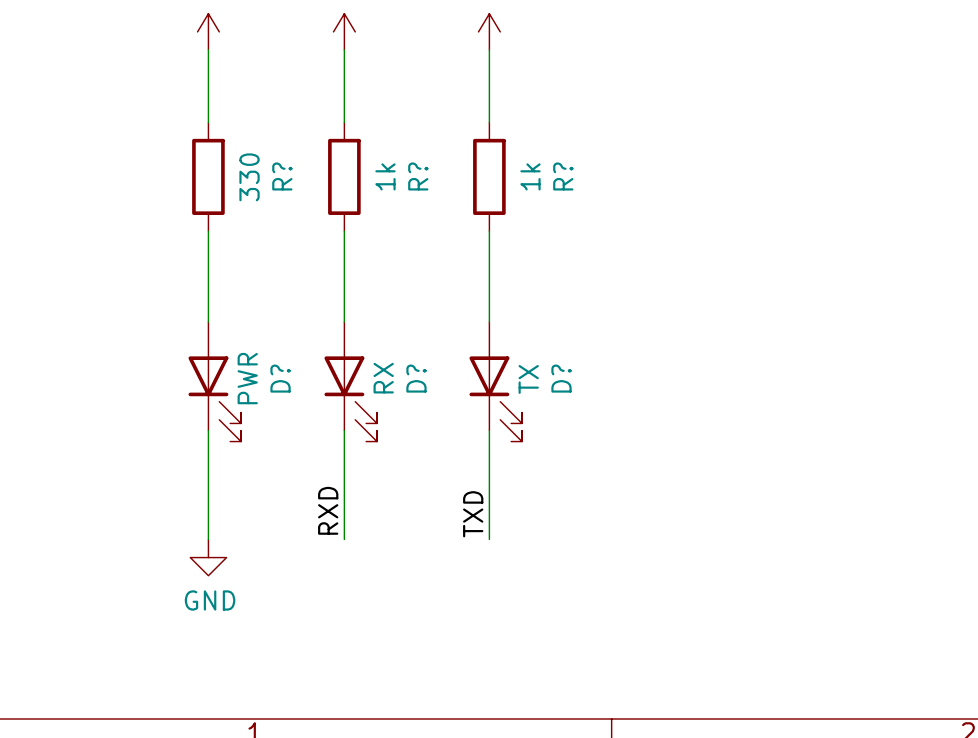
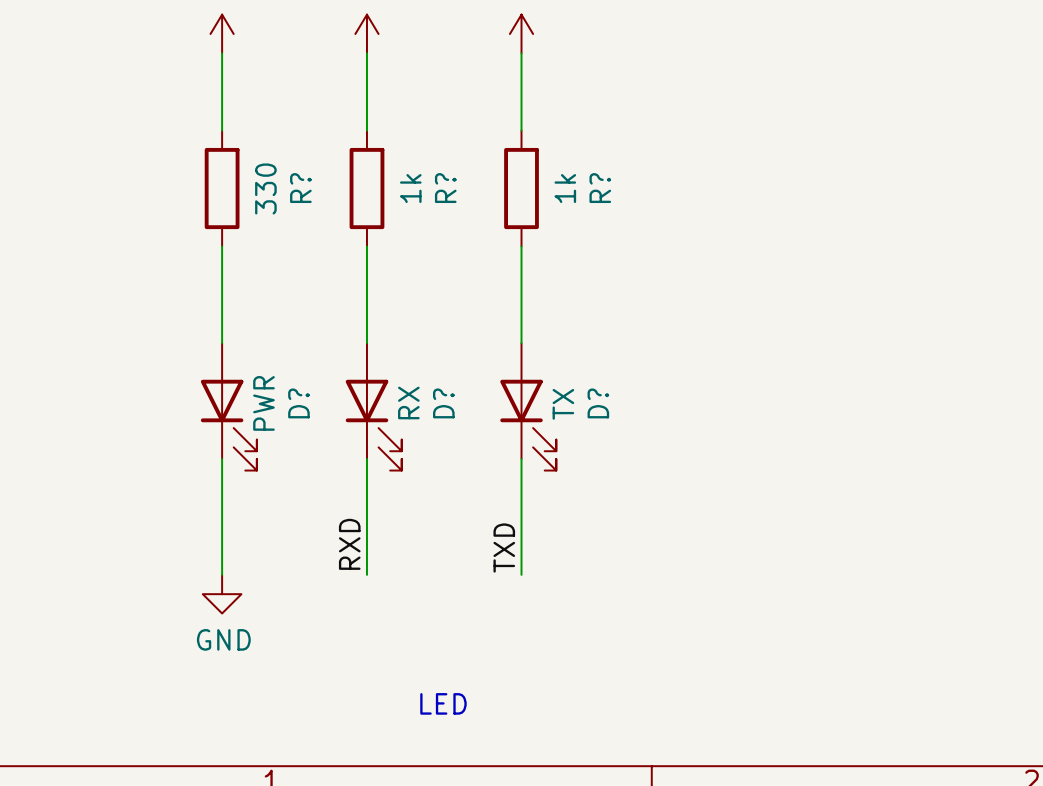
text: none -> LED (443, 703)

